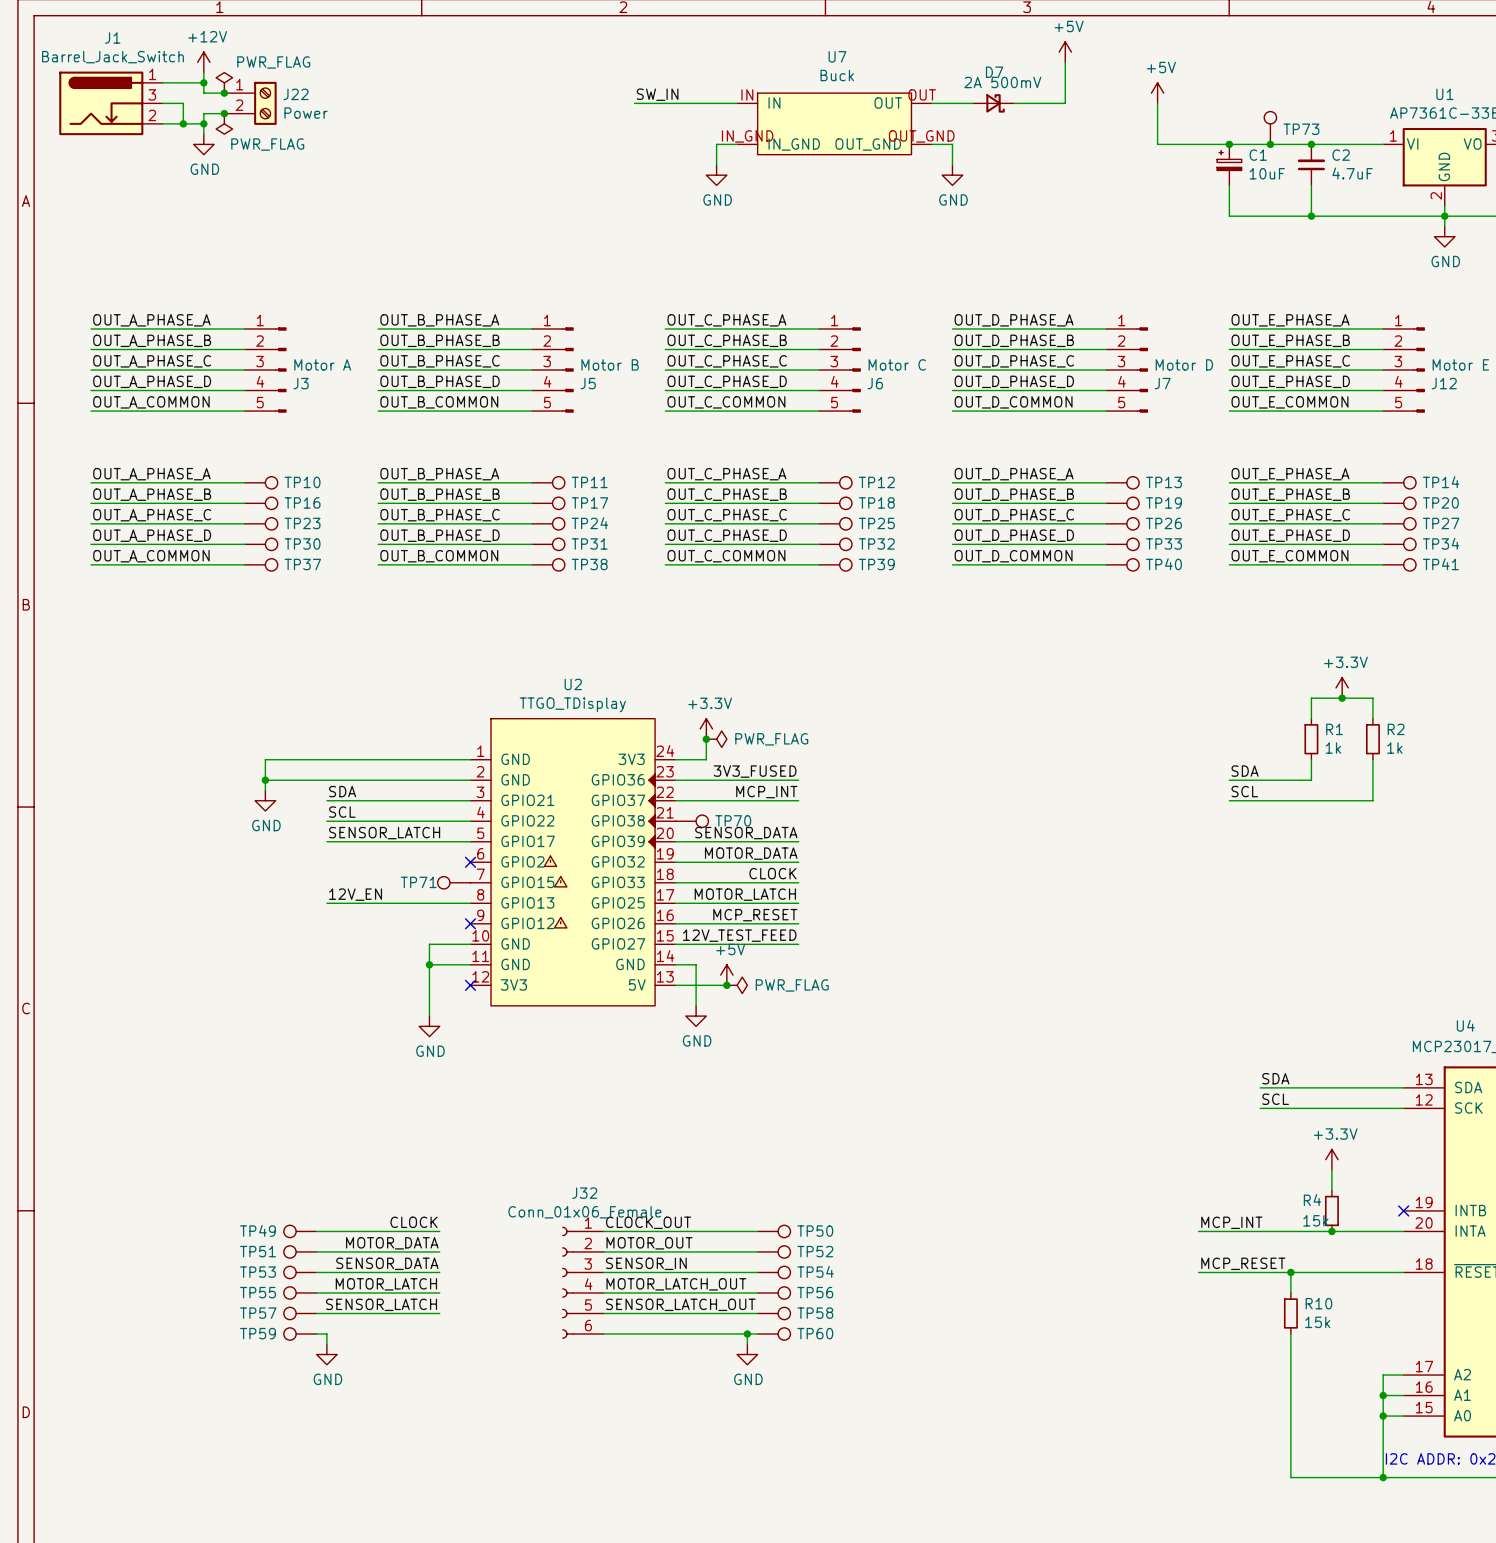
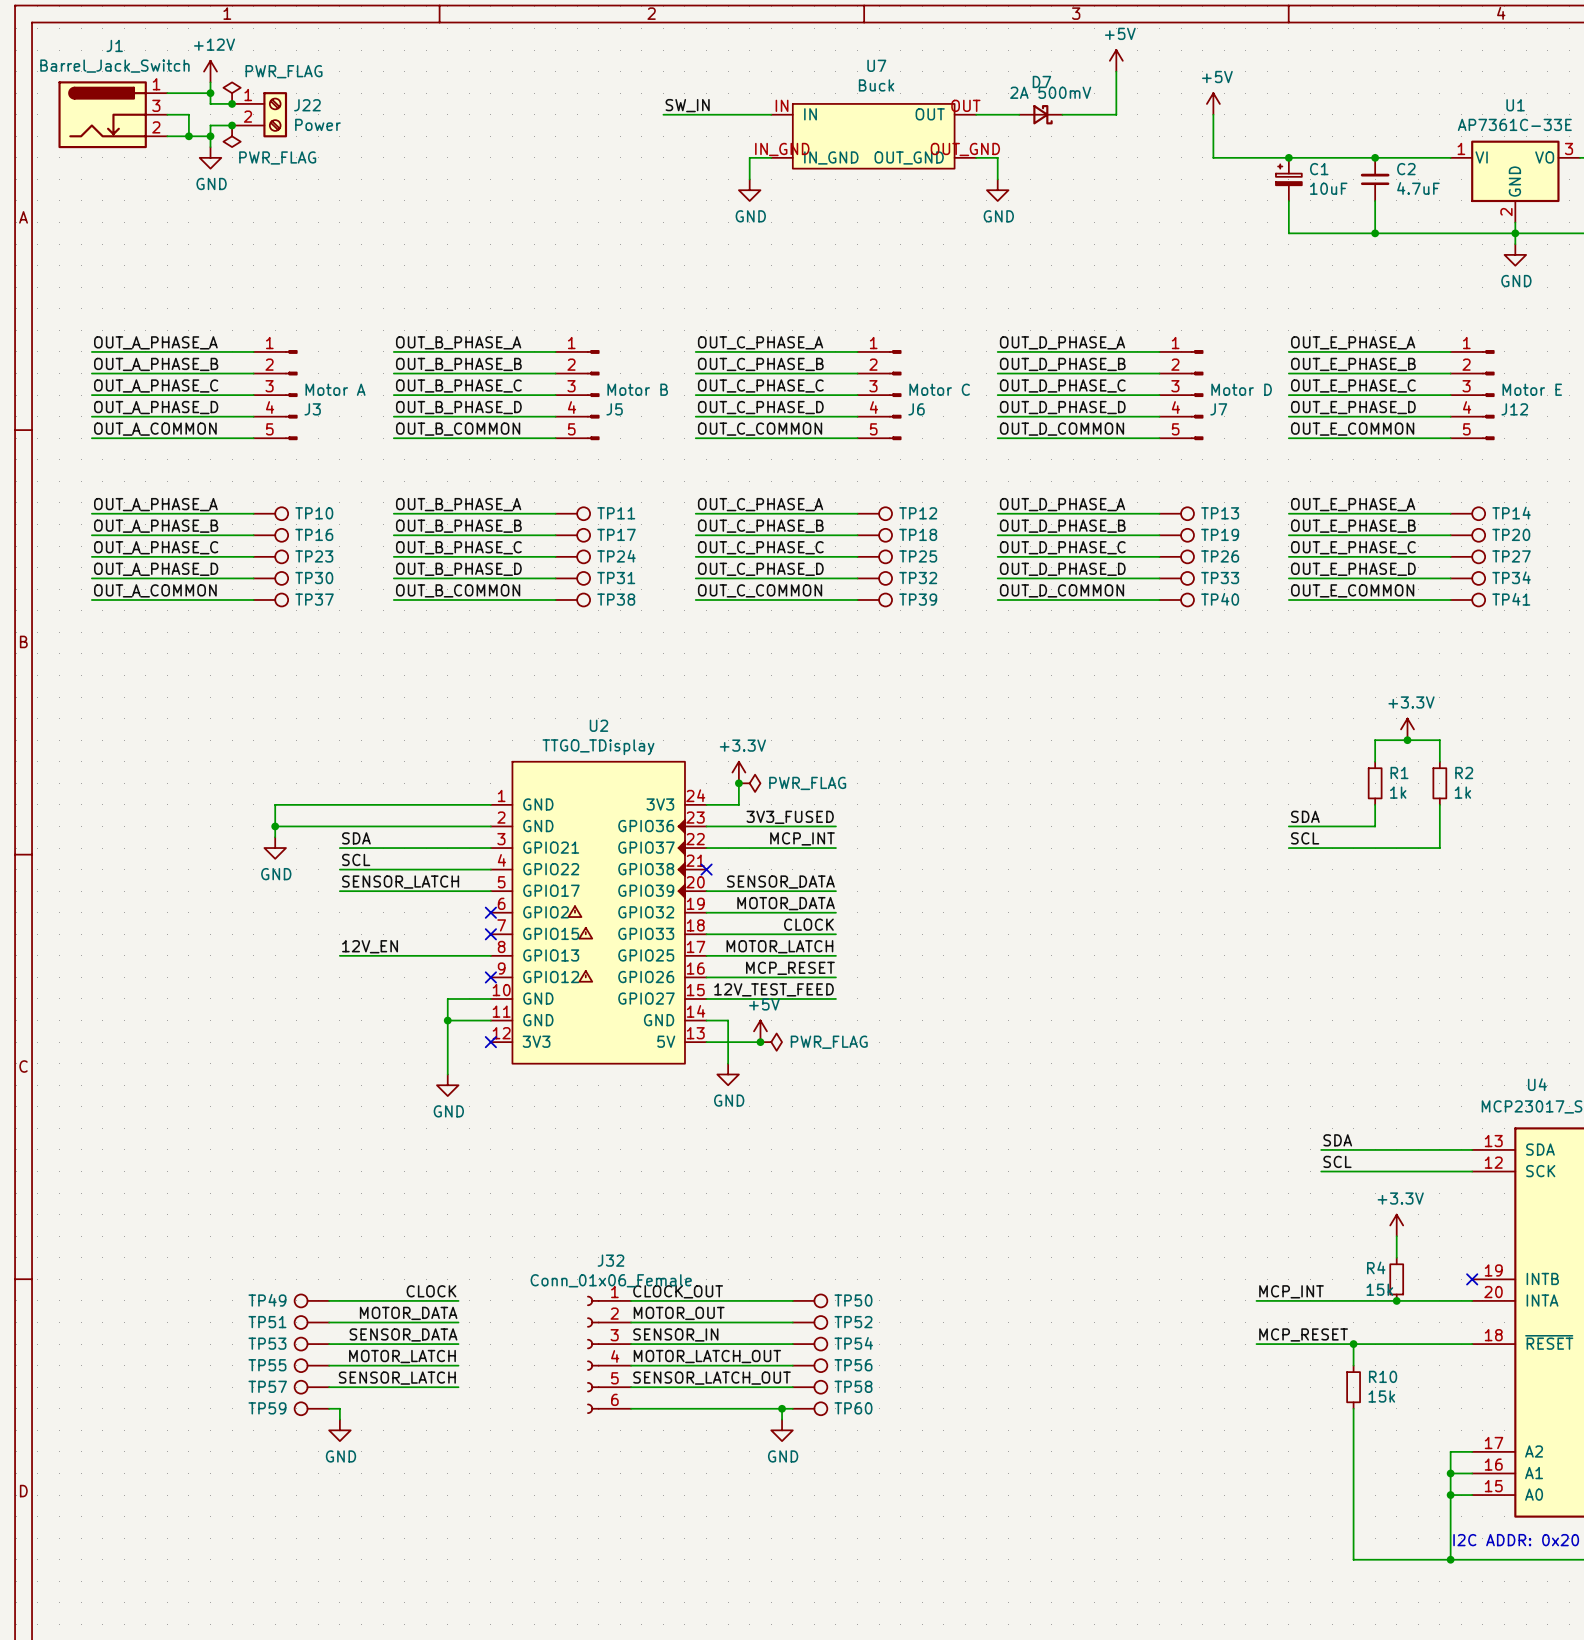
TP73: (1270, 127) -> none
junction: (1270, 144) -> none
no-connect mark: none -> (706, 869)
TP70: (691, 821) -> none
TP71: (454, 882) -> none
no-connect mark: none -> (490, 934)

